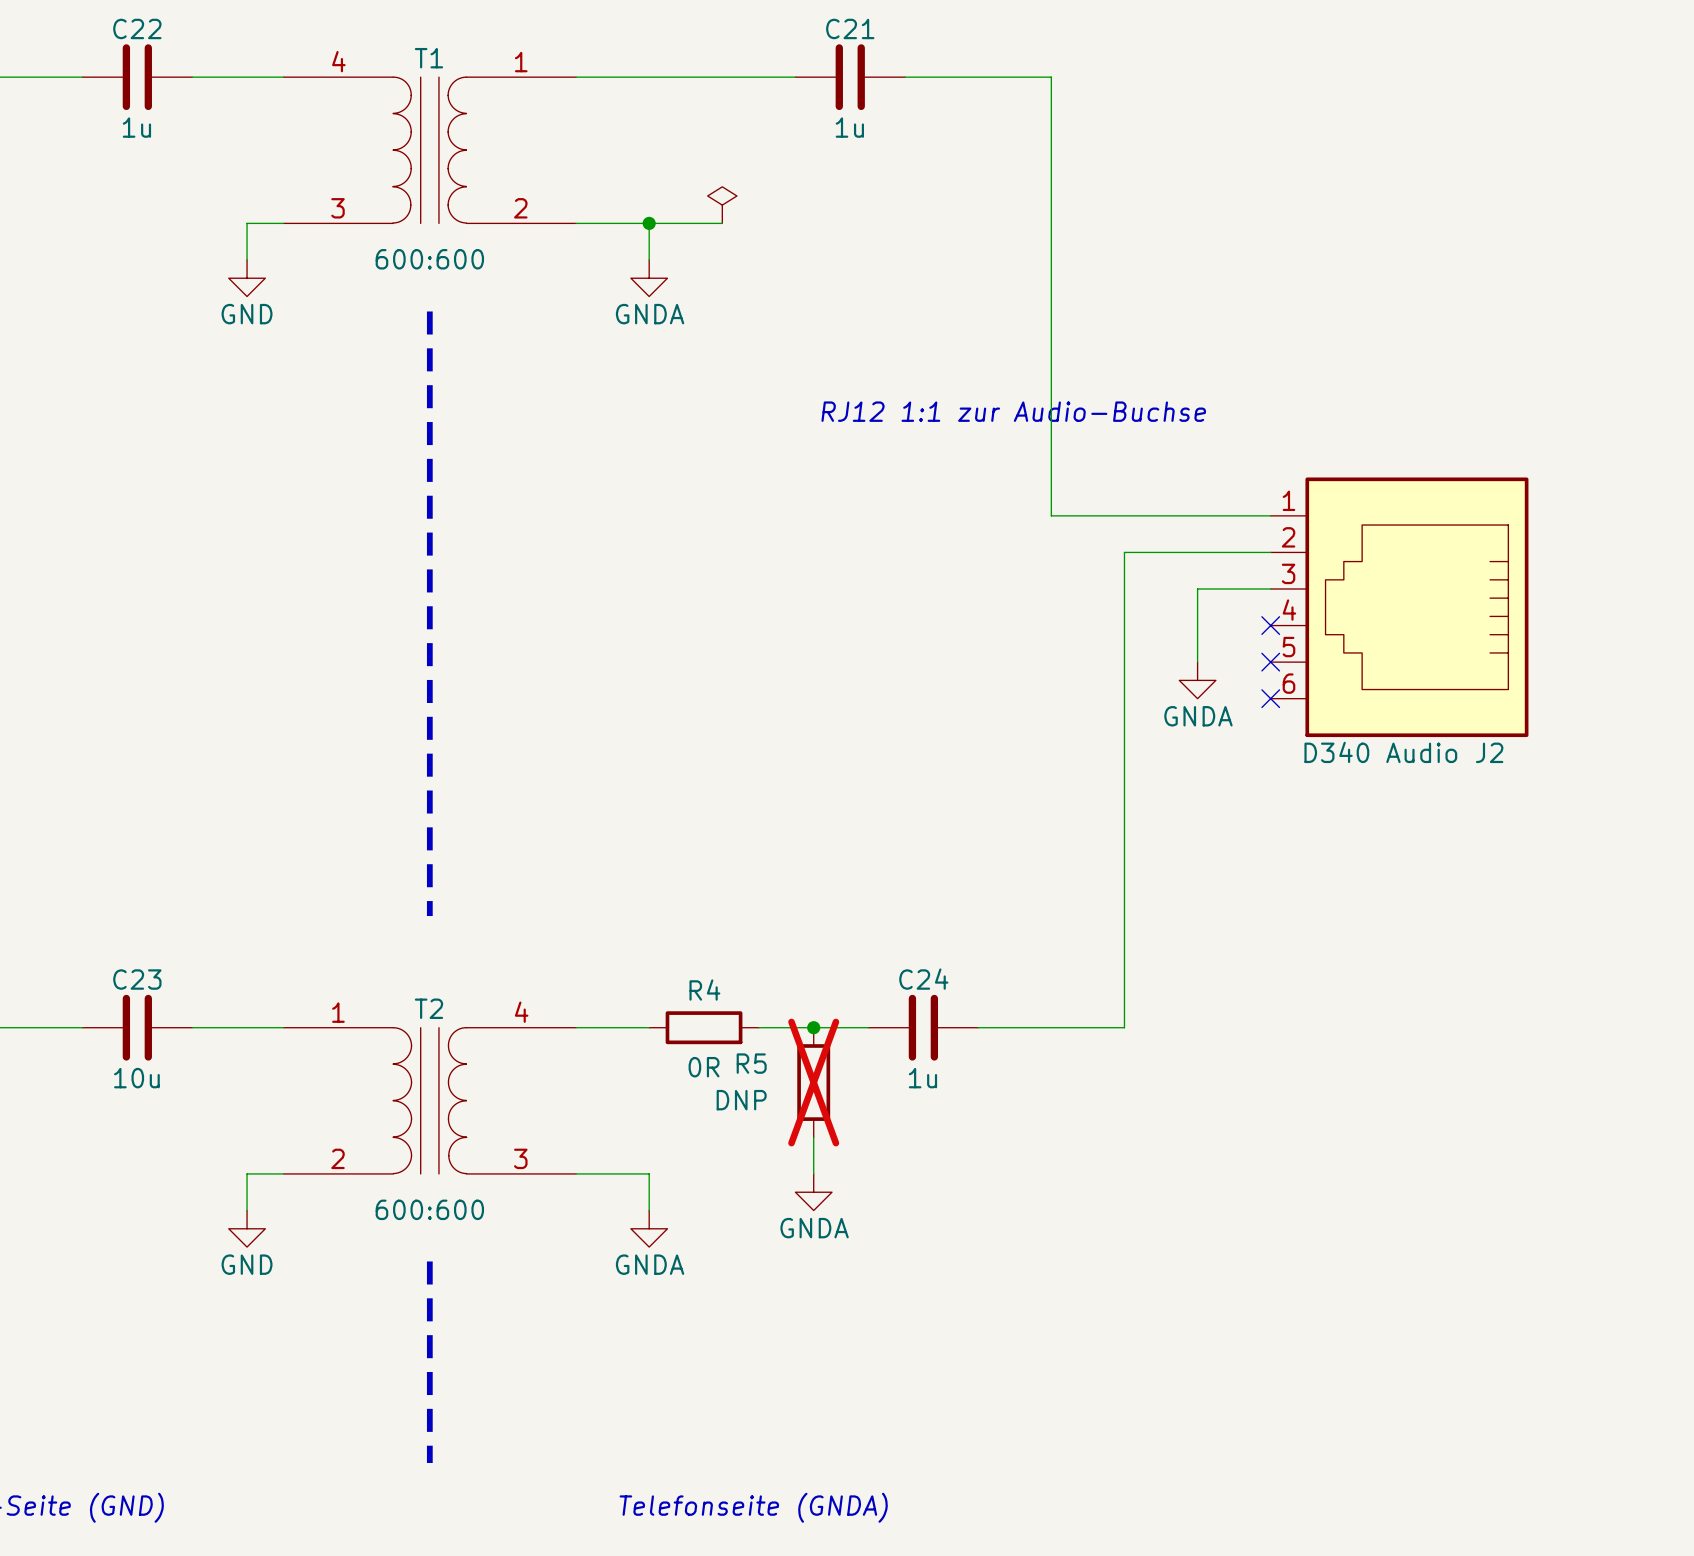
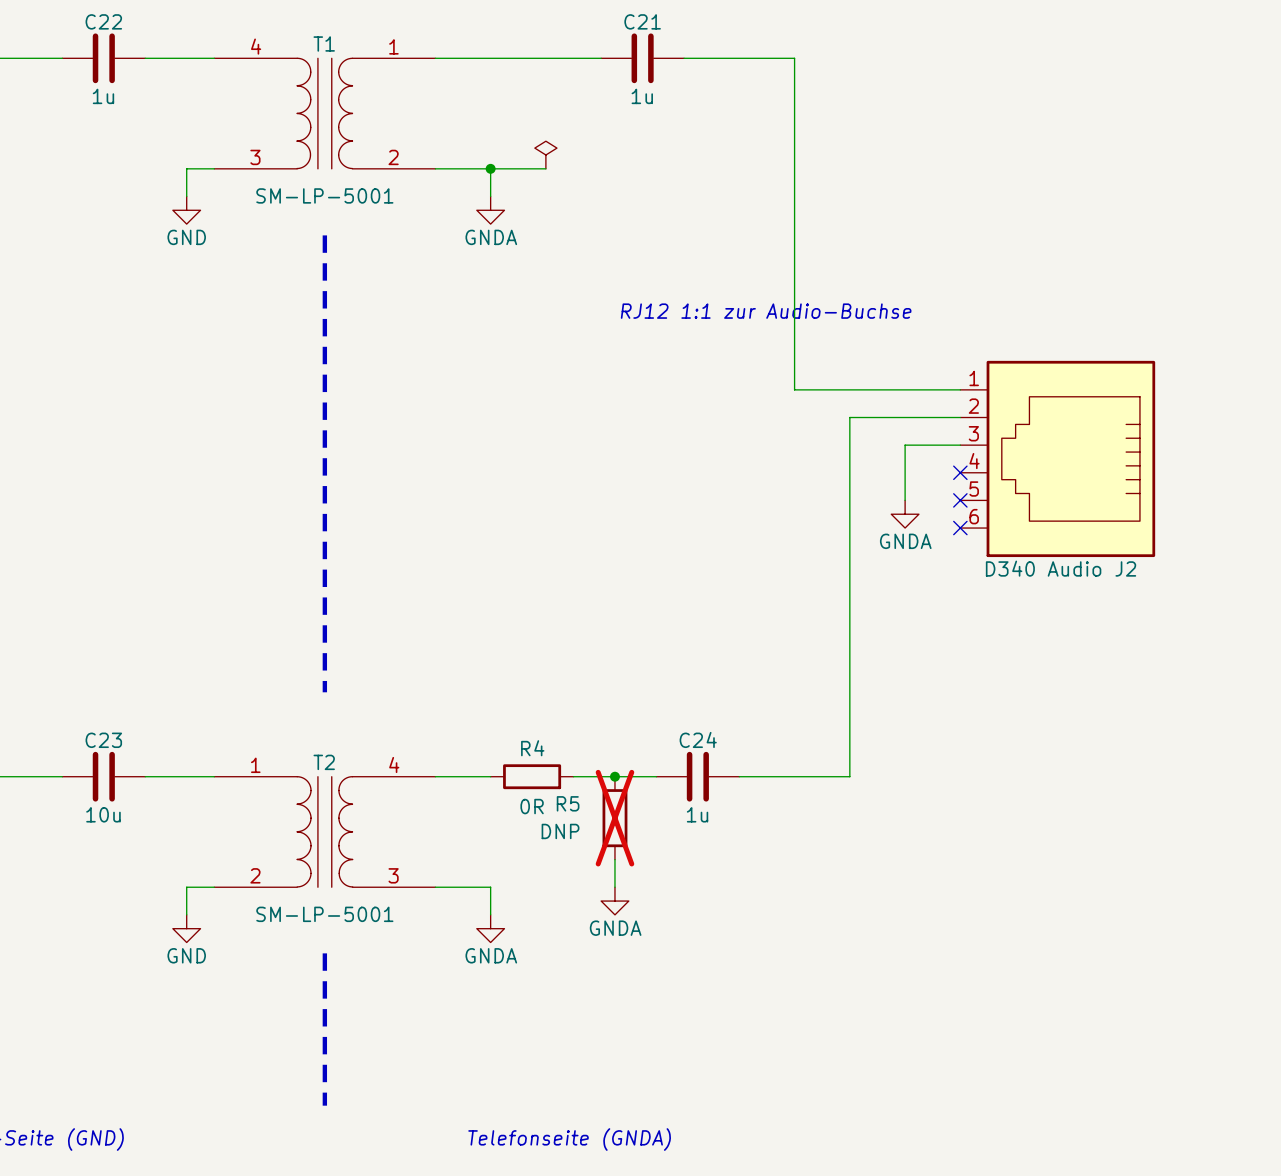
T1 value: 600:600 (429, 259) -> SM-LP-5001 (324, 195)
T2 value: 600:600 (429, 1209) -> SM-LP-5001 (324, 914)

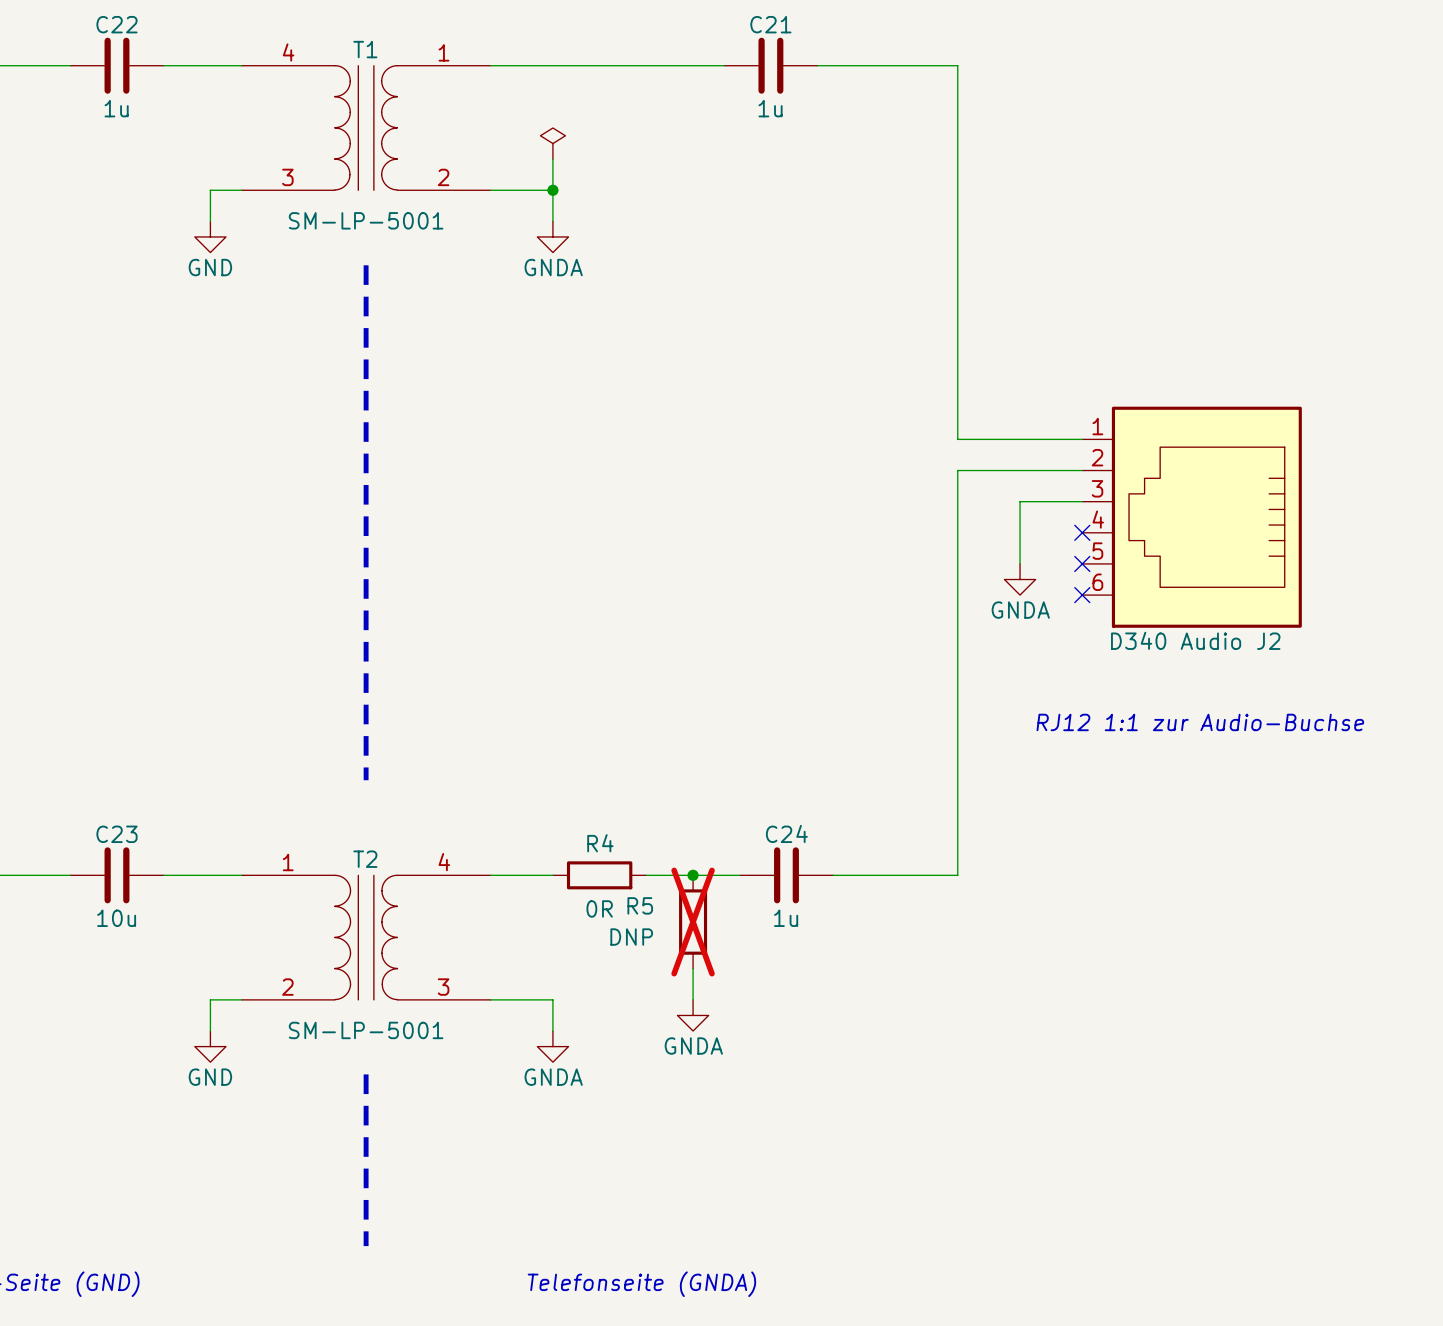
C21 position: (642, 58) -> (770, 65)
wire: (794, 58) (794, 389) (849, 389) -> (895, 65) (957, 65) (957, 439)
power symbol position: (545, 155) -> (552, 143)
wire: (490, 168) (545, 168) -> (552, 190) (552, 159)
text: RJ12 1:1 zur Audio-Buchse (766, 311) -> none
text: none -> RJ12 1:1 zur Audio-Buchse (1200, 722)

